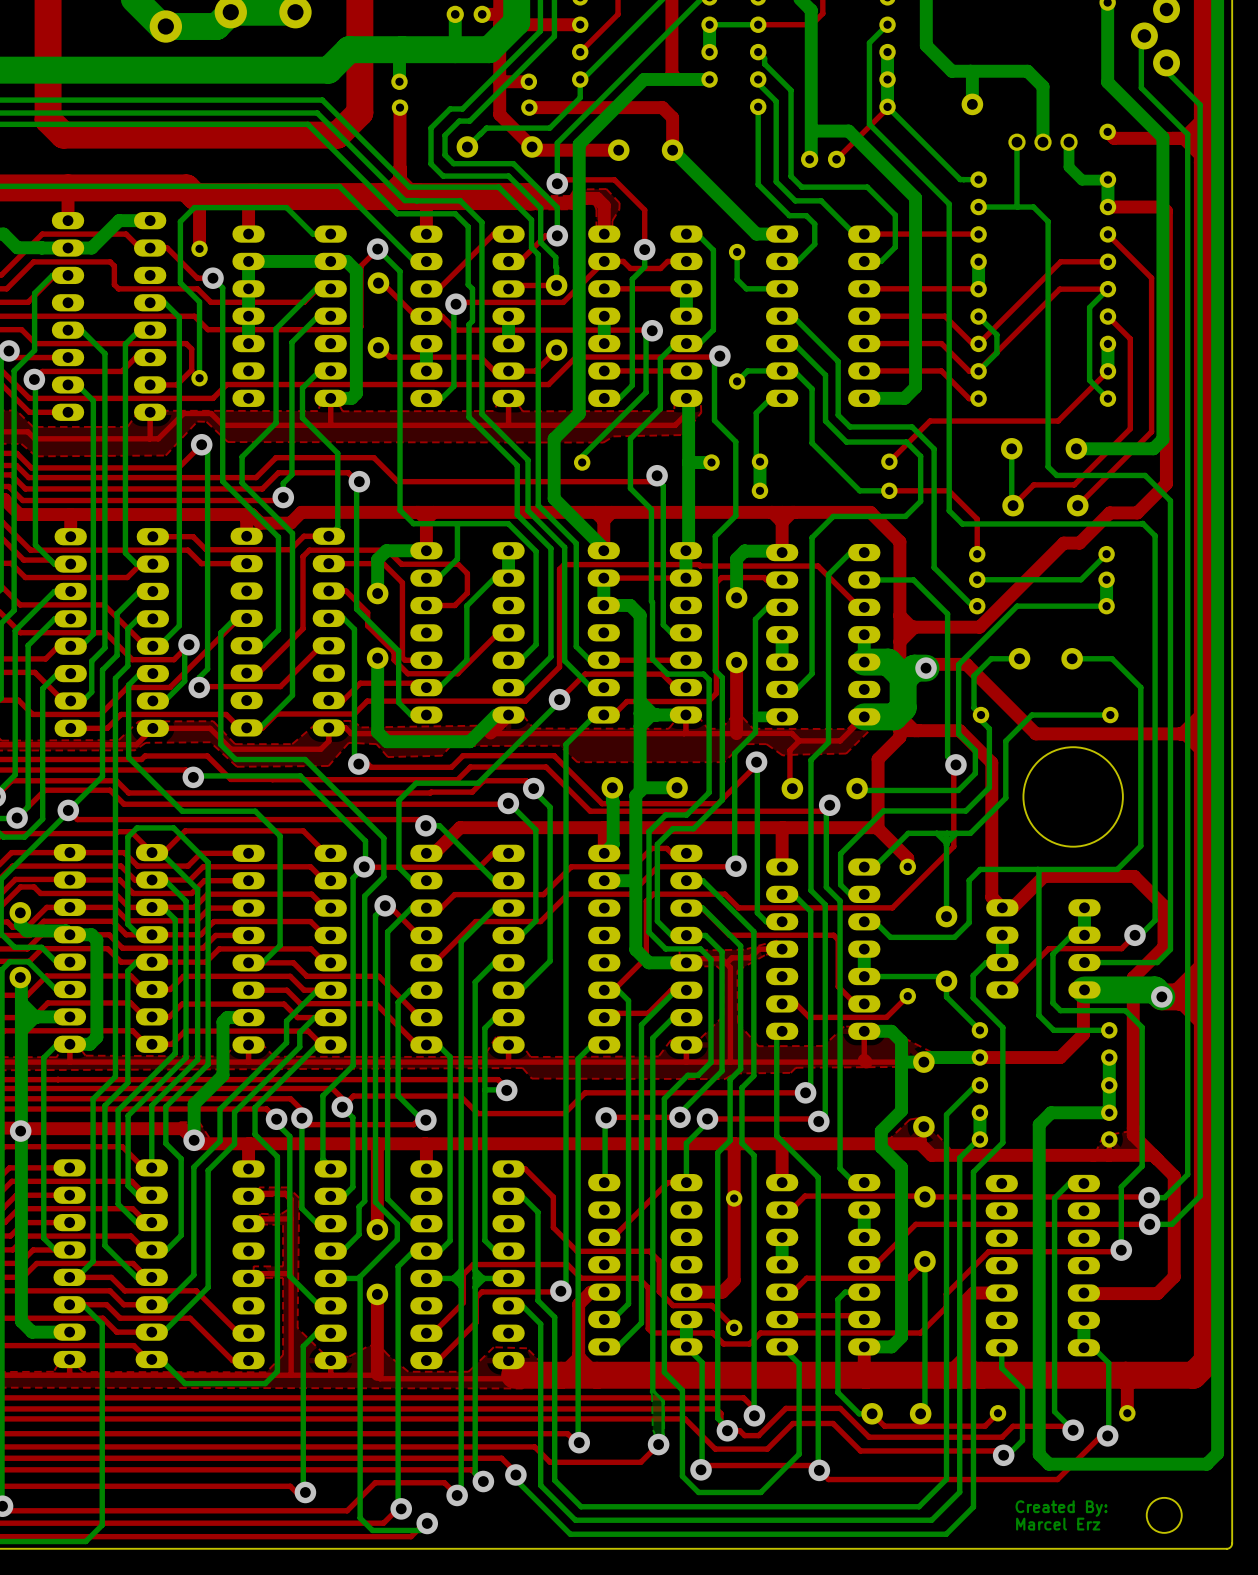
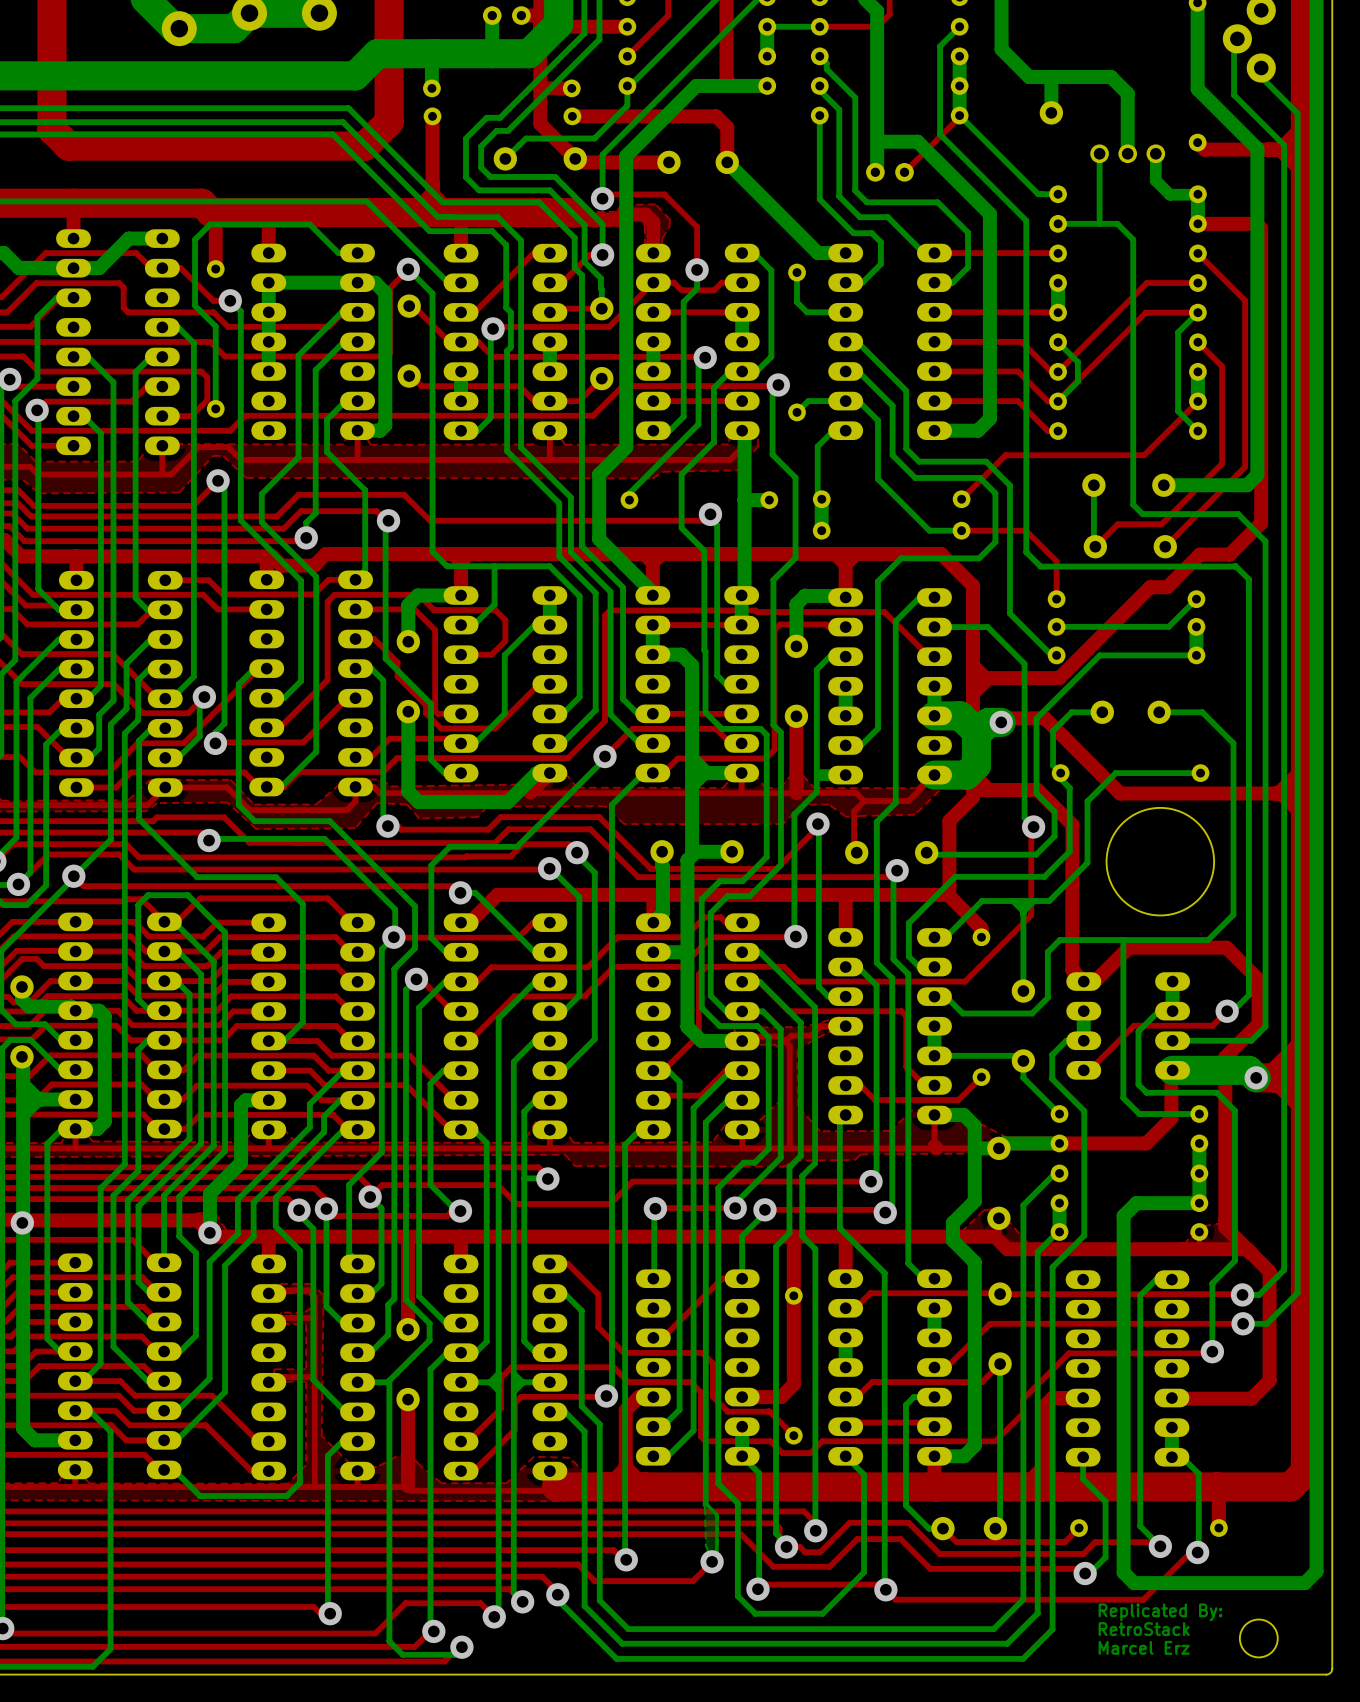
text: none -> Replicated By: (1160, 1612)
text: Created By: (1061, 1508) -> RetroStack (1144, 1629)

